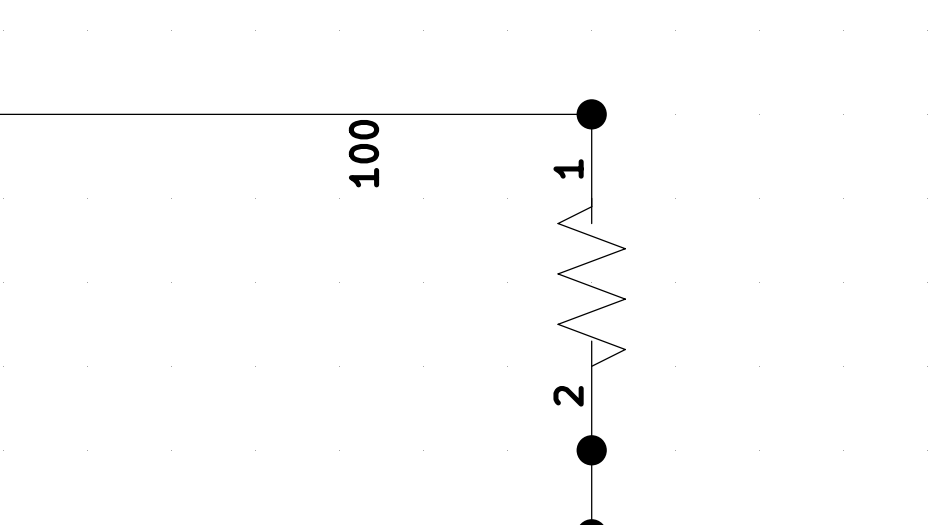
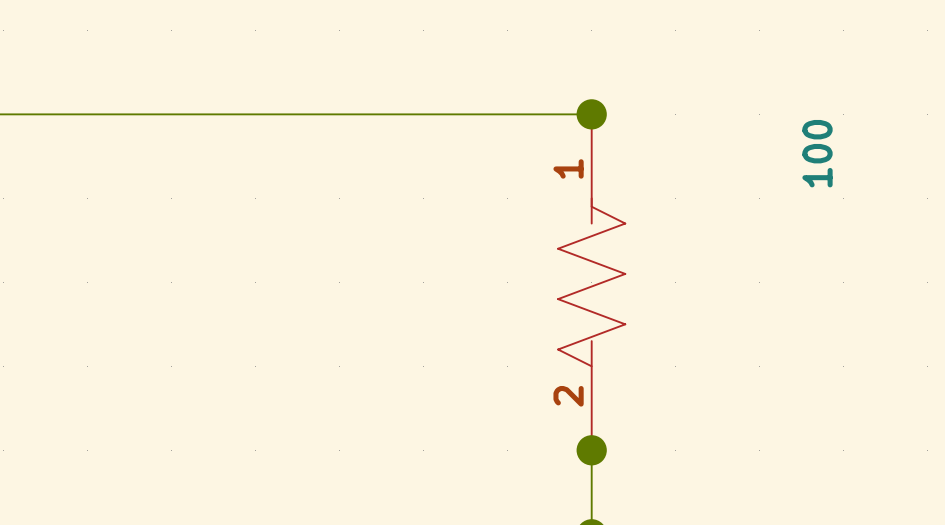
part flip: as is (591, 282) -> left-right (591, 282)

